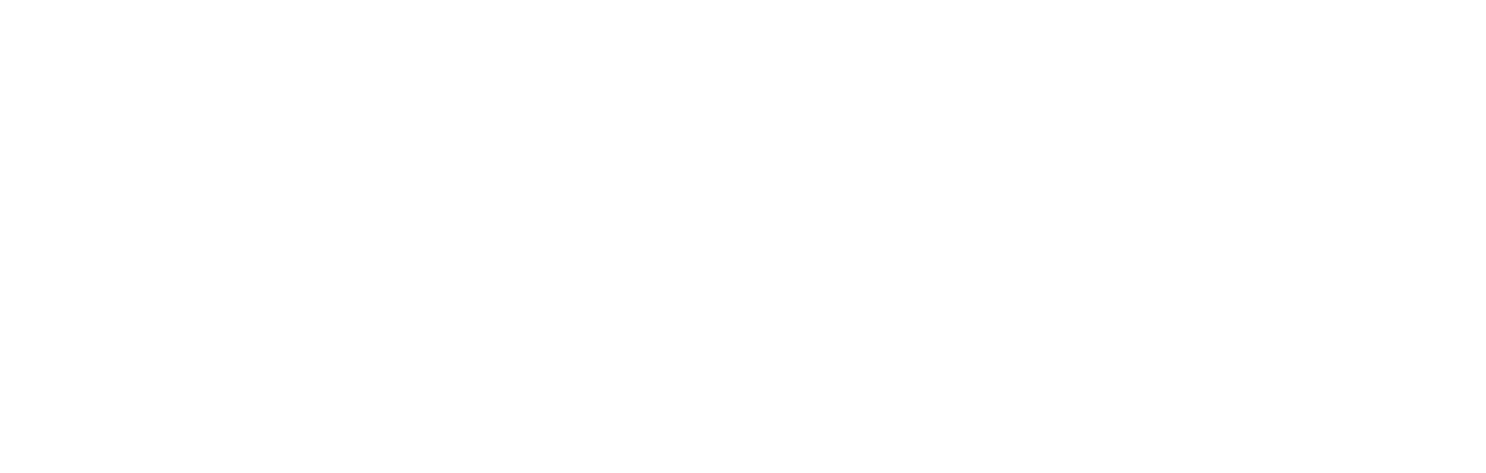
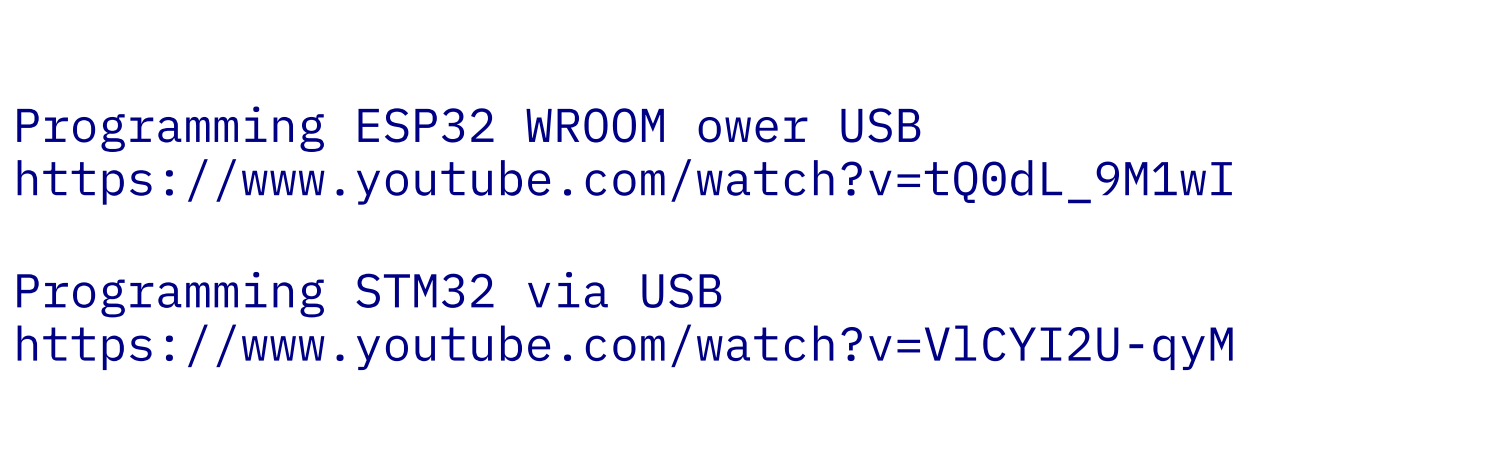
text: none -> Programming ESP32 WROOM ower USB (468, 129)
text: none -> https://www.youtube.com/watch?v=tQ0dL_9M1wI (624, 181)
text: none -> Programming STM32 via USB (369, 294)
text: none -> https://www.youtube.com/watch?v=VlCYI2U-qyM (625, 347)

